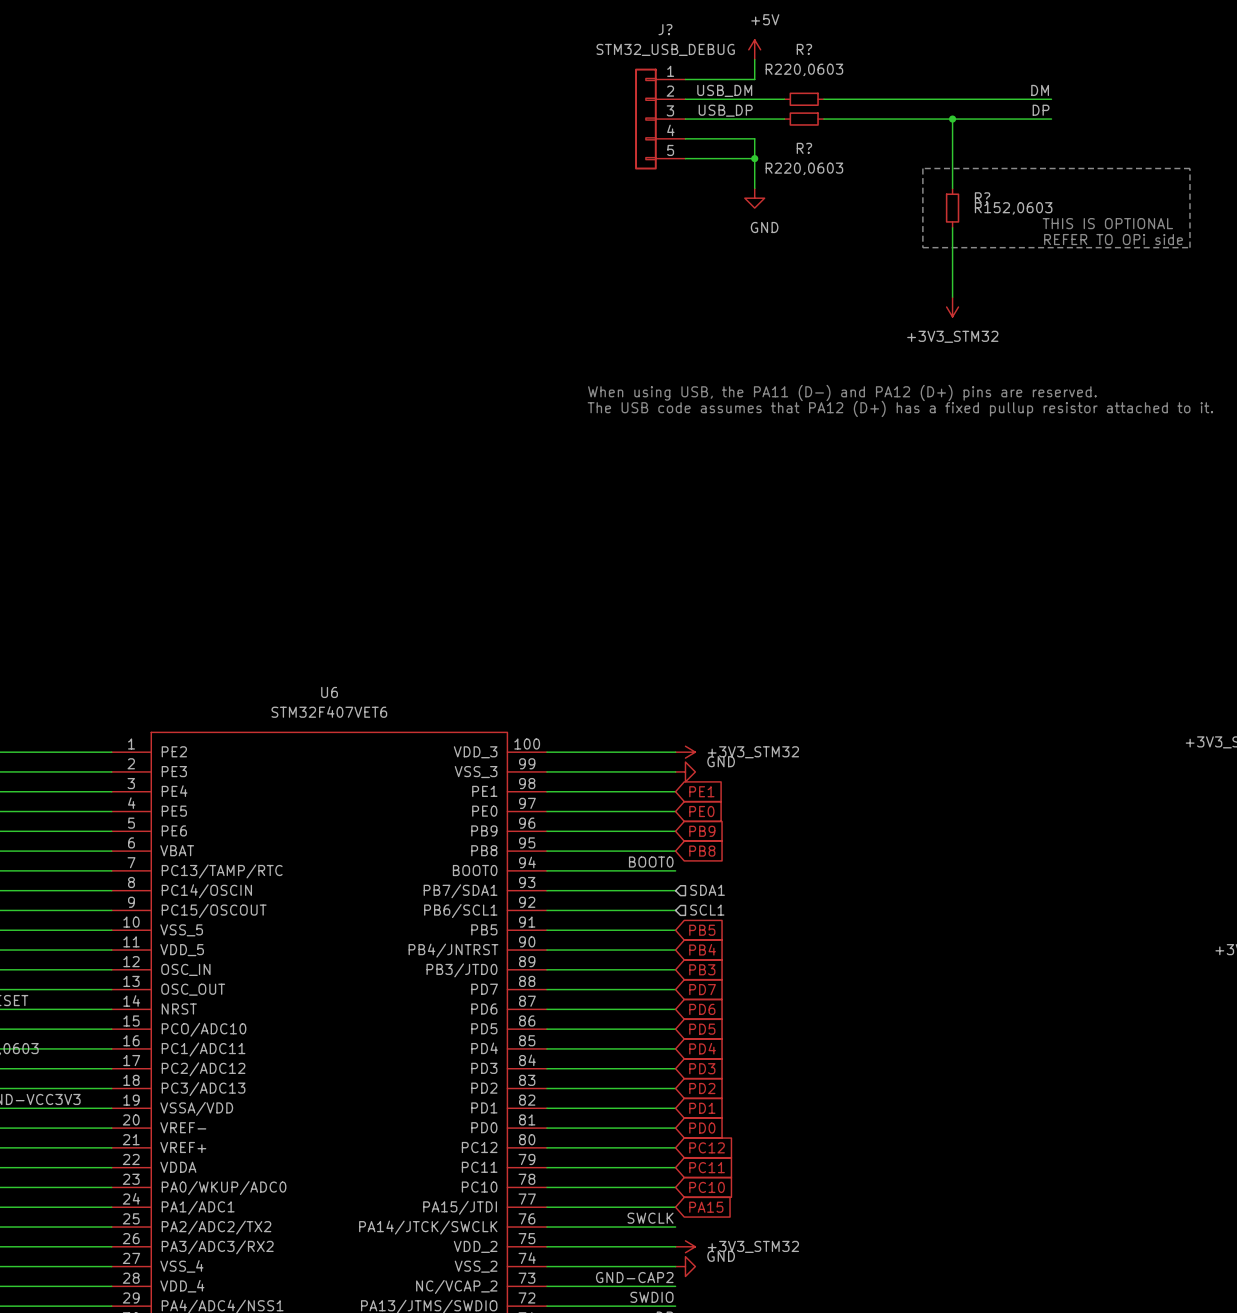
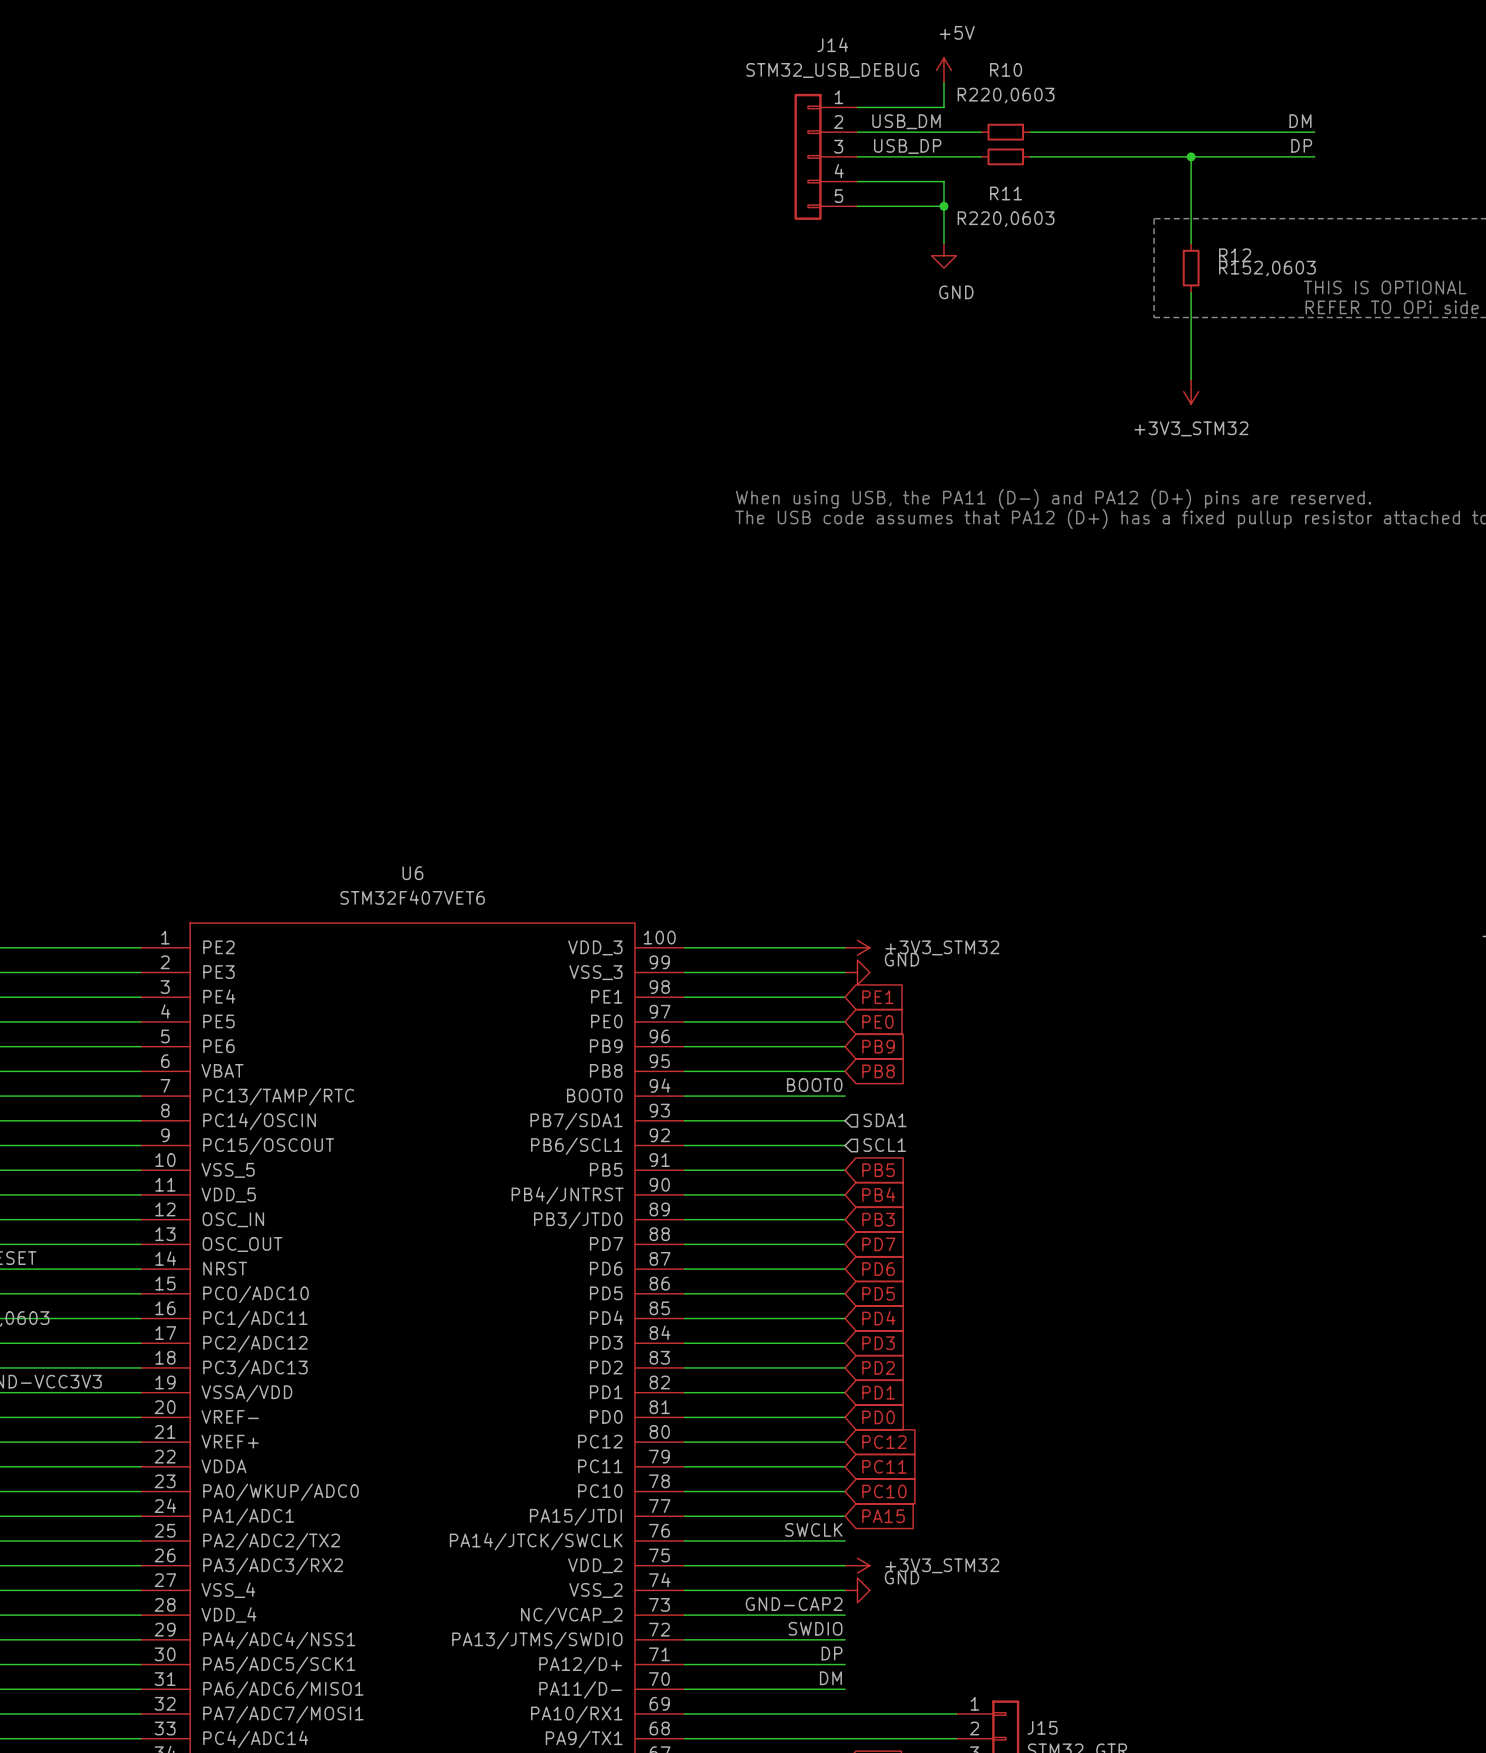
J? name: J? (665, 29) -> J14 (832, 44)
R? name: R? (804, 49) -> R10 (1006, 69)
R? name: R? (804, 148) -> R11 (1006, 193)
R? name: R? (982, 197) -> R12 (1235, 255)

